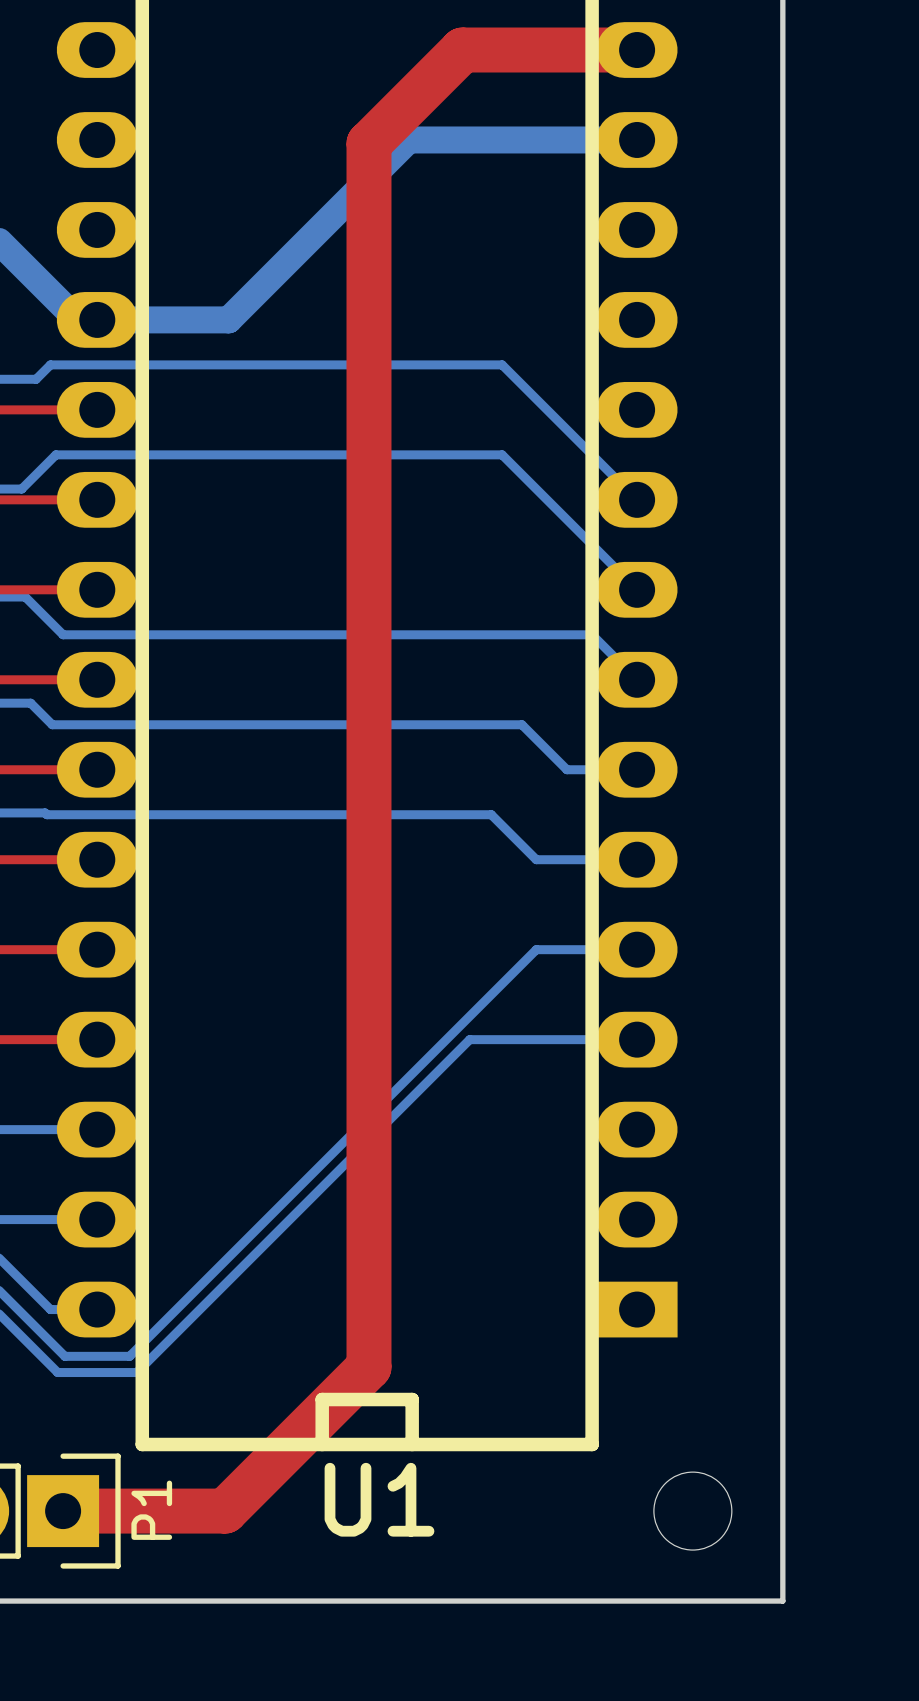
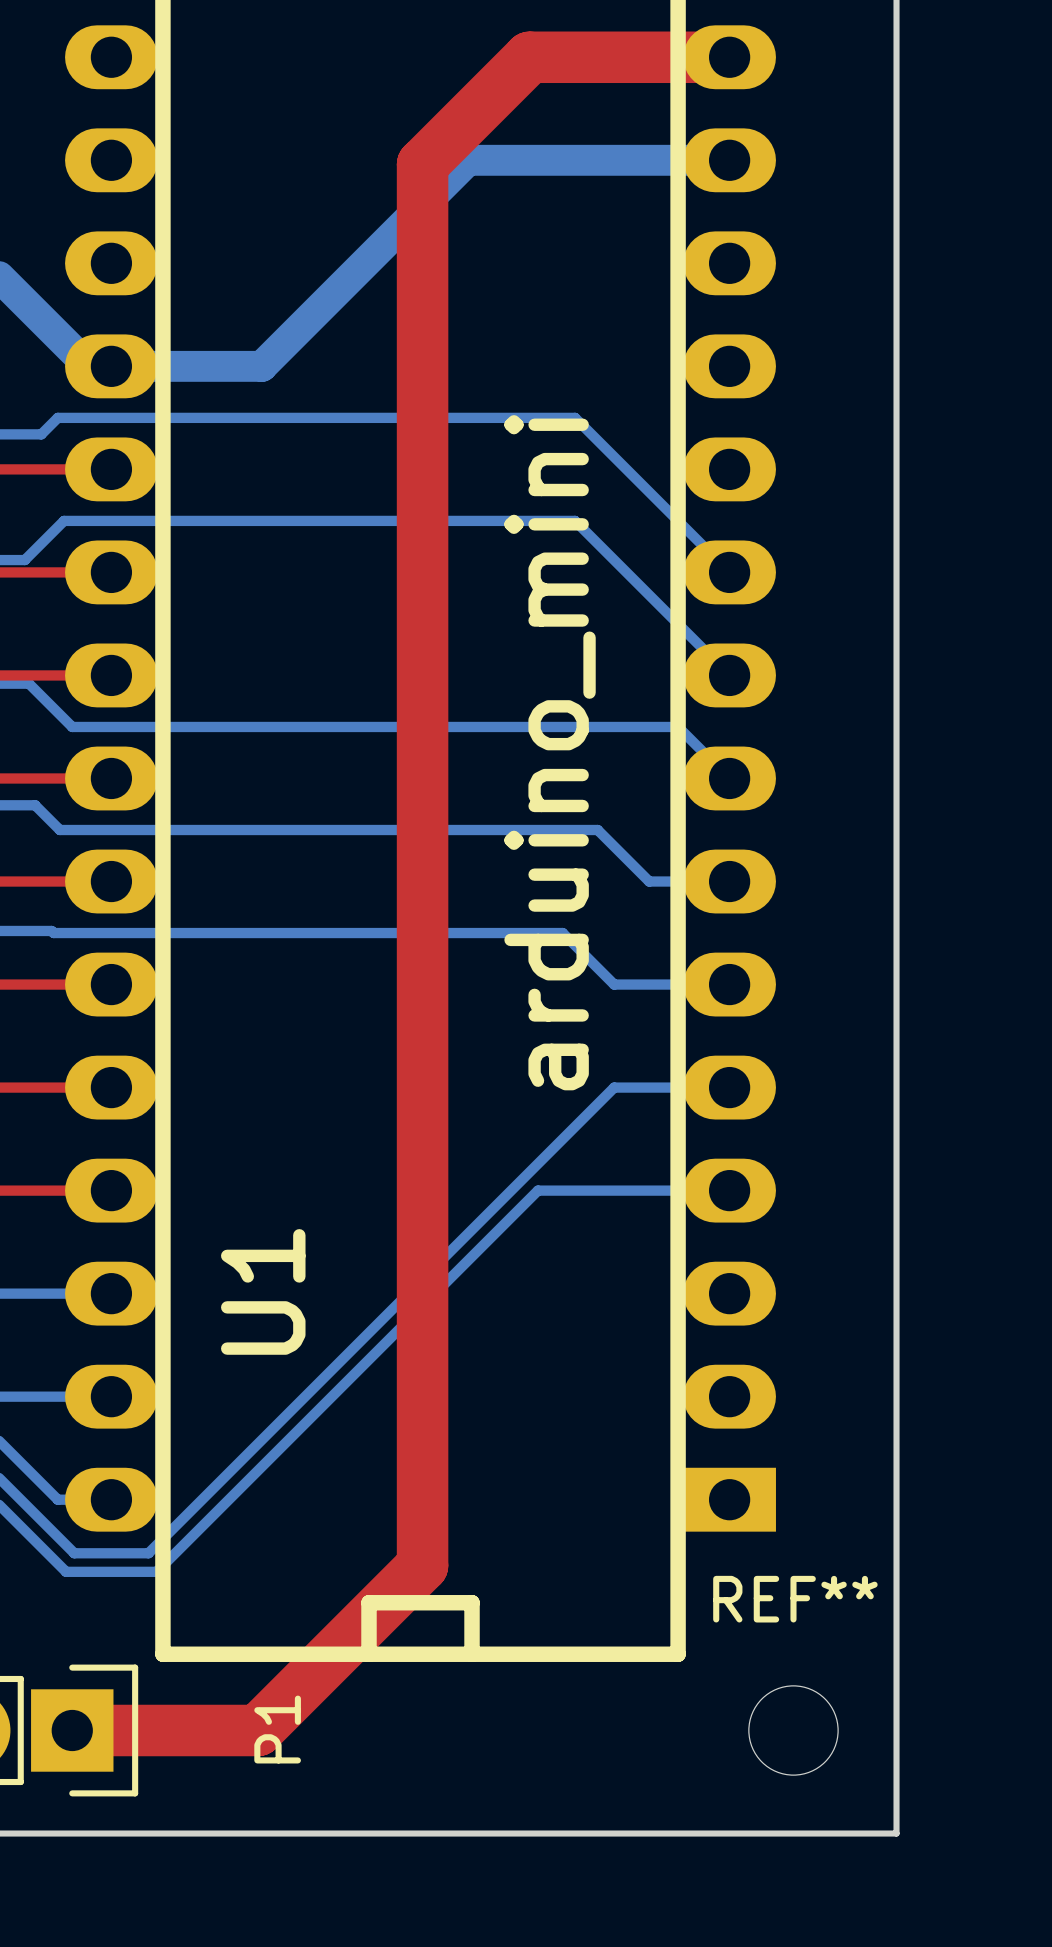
U1 value: none -> arduino_mini (550, 752)
REF** name: none -> REF** (795, 1599)
U1 name rotation: 0° (379, 1499) -> 90° counterclockwise (263, 1291)
U1 name position: U1 (379, 1499) -> U1 (263, 1291)
P1 name position: P1 (151, 1510) -> P1 (277, 1729)

